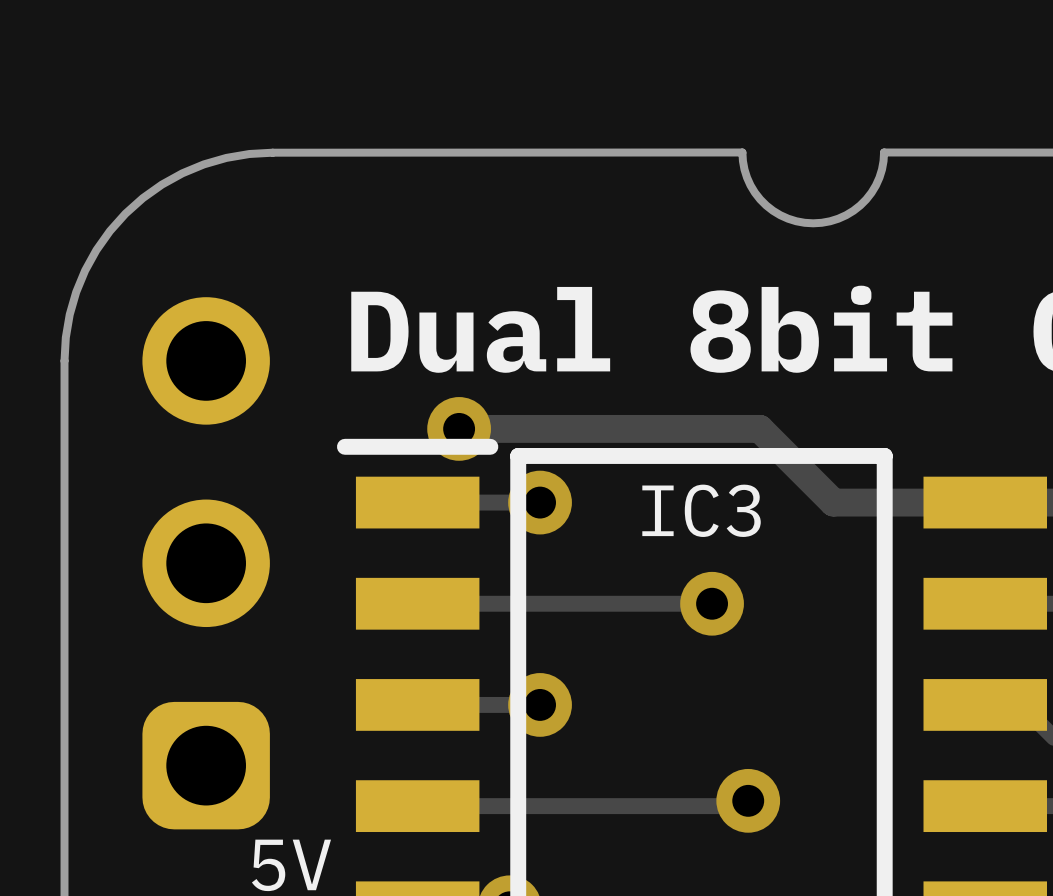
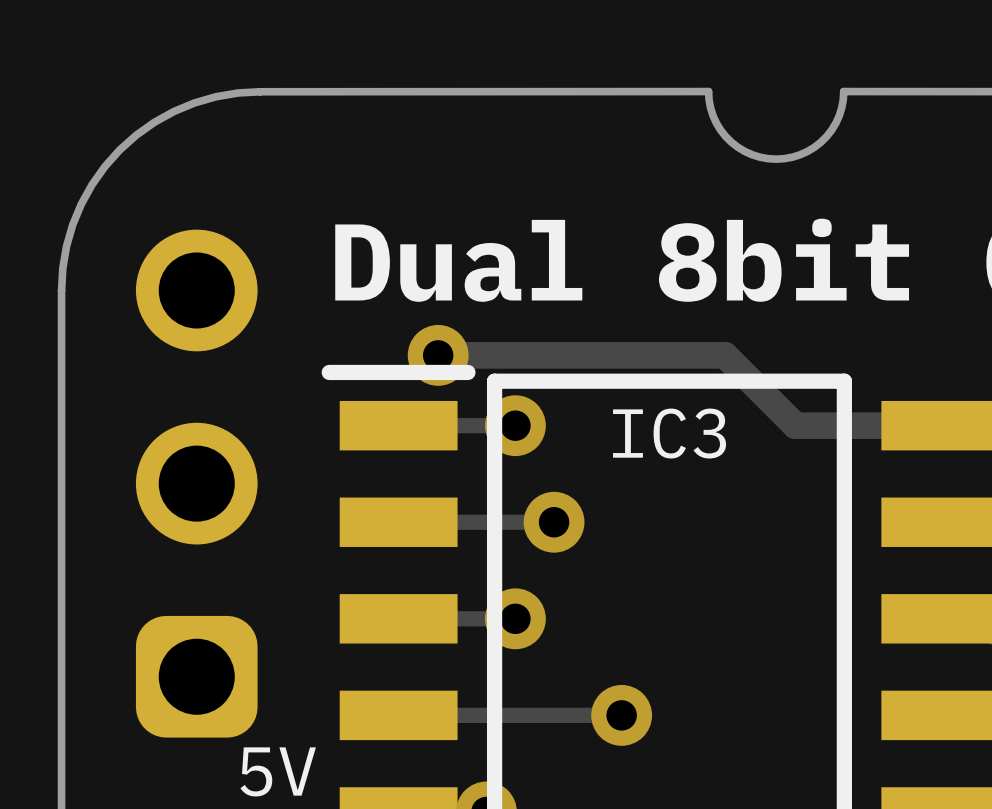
track: (580, 603) (712, 603) -> none
via: none -> (554, 522)
via: (712, 603) -> none
track: (748, 800) (742, 806) (651, 806) -> none
via position: (748, 800) -> (621, 715)

